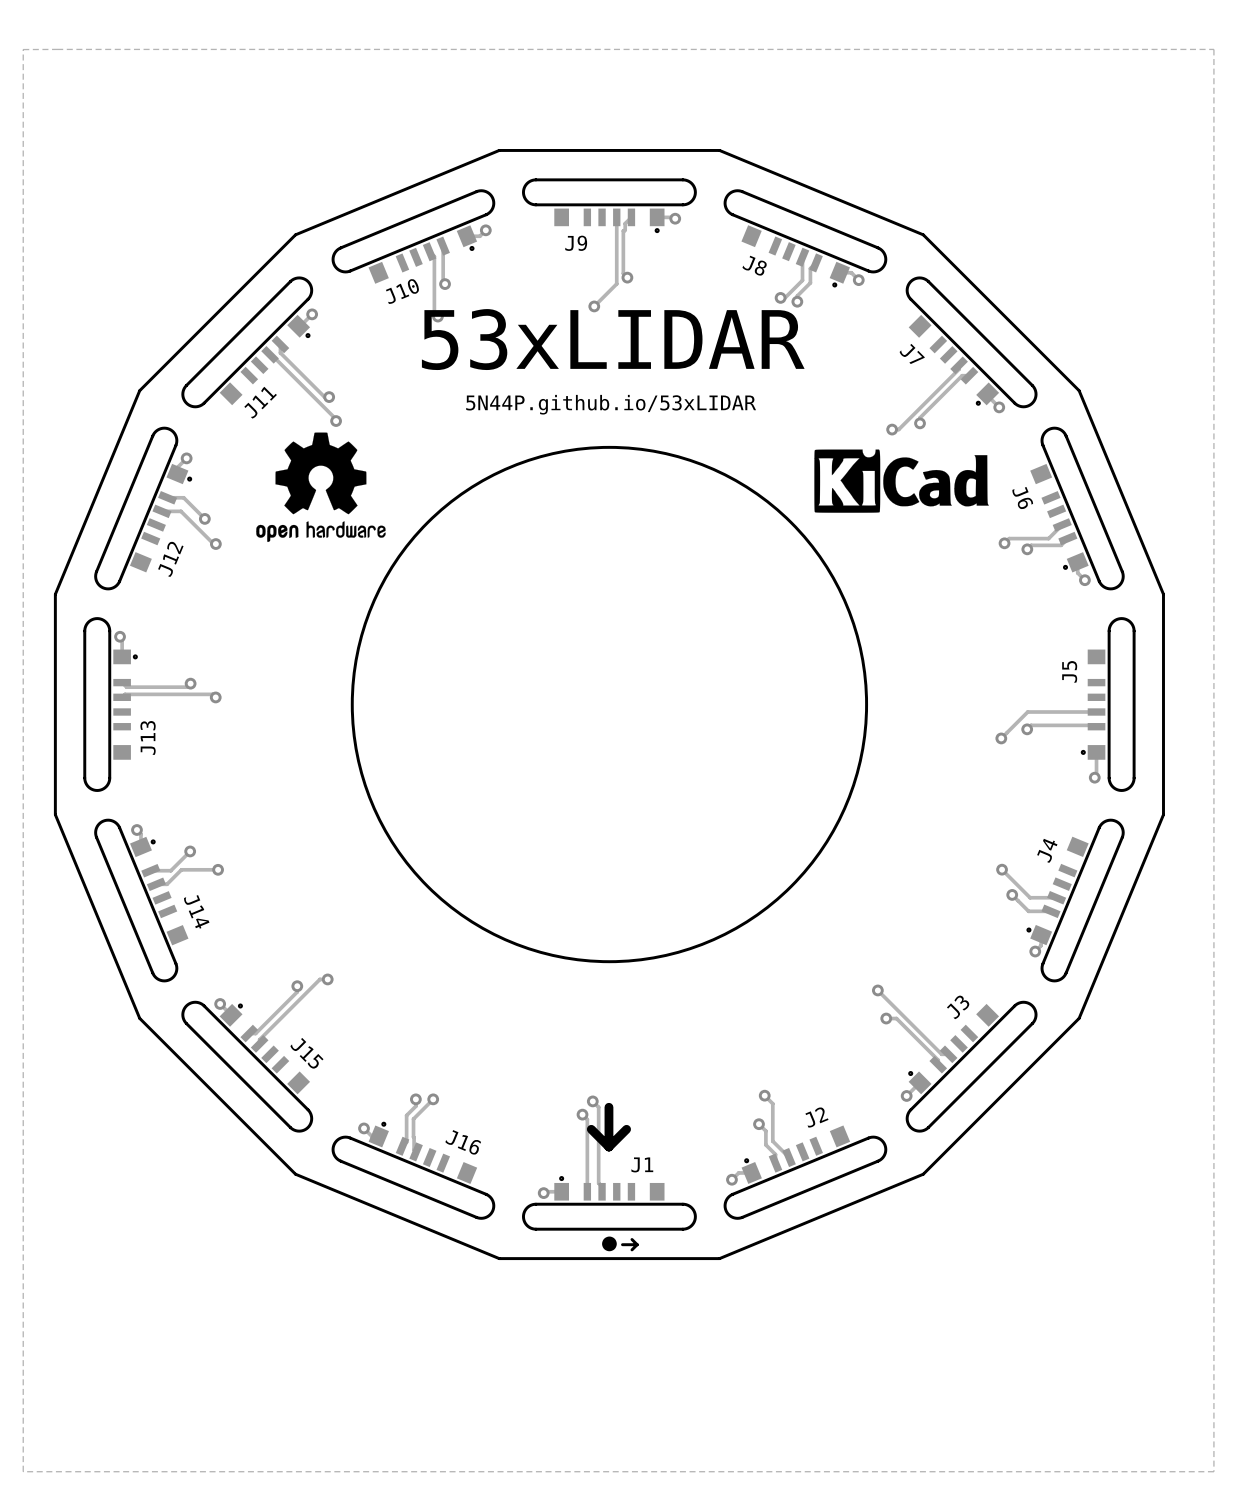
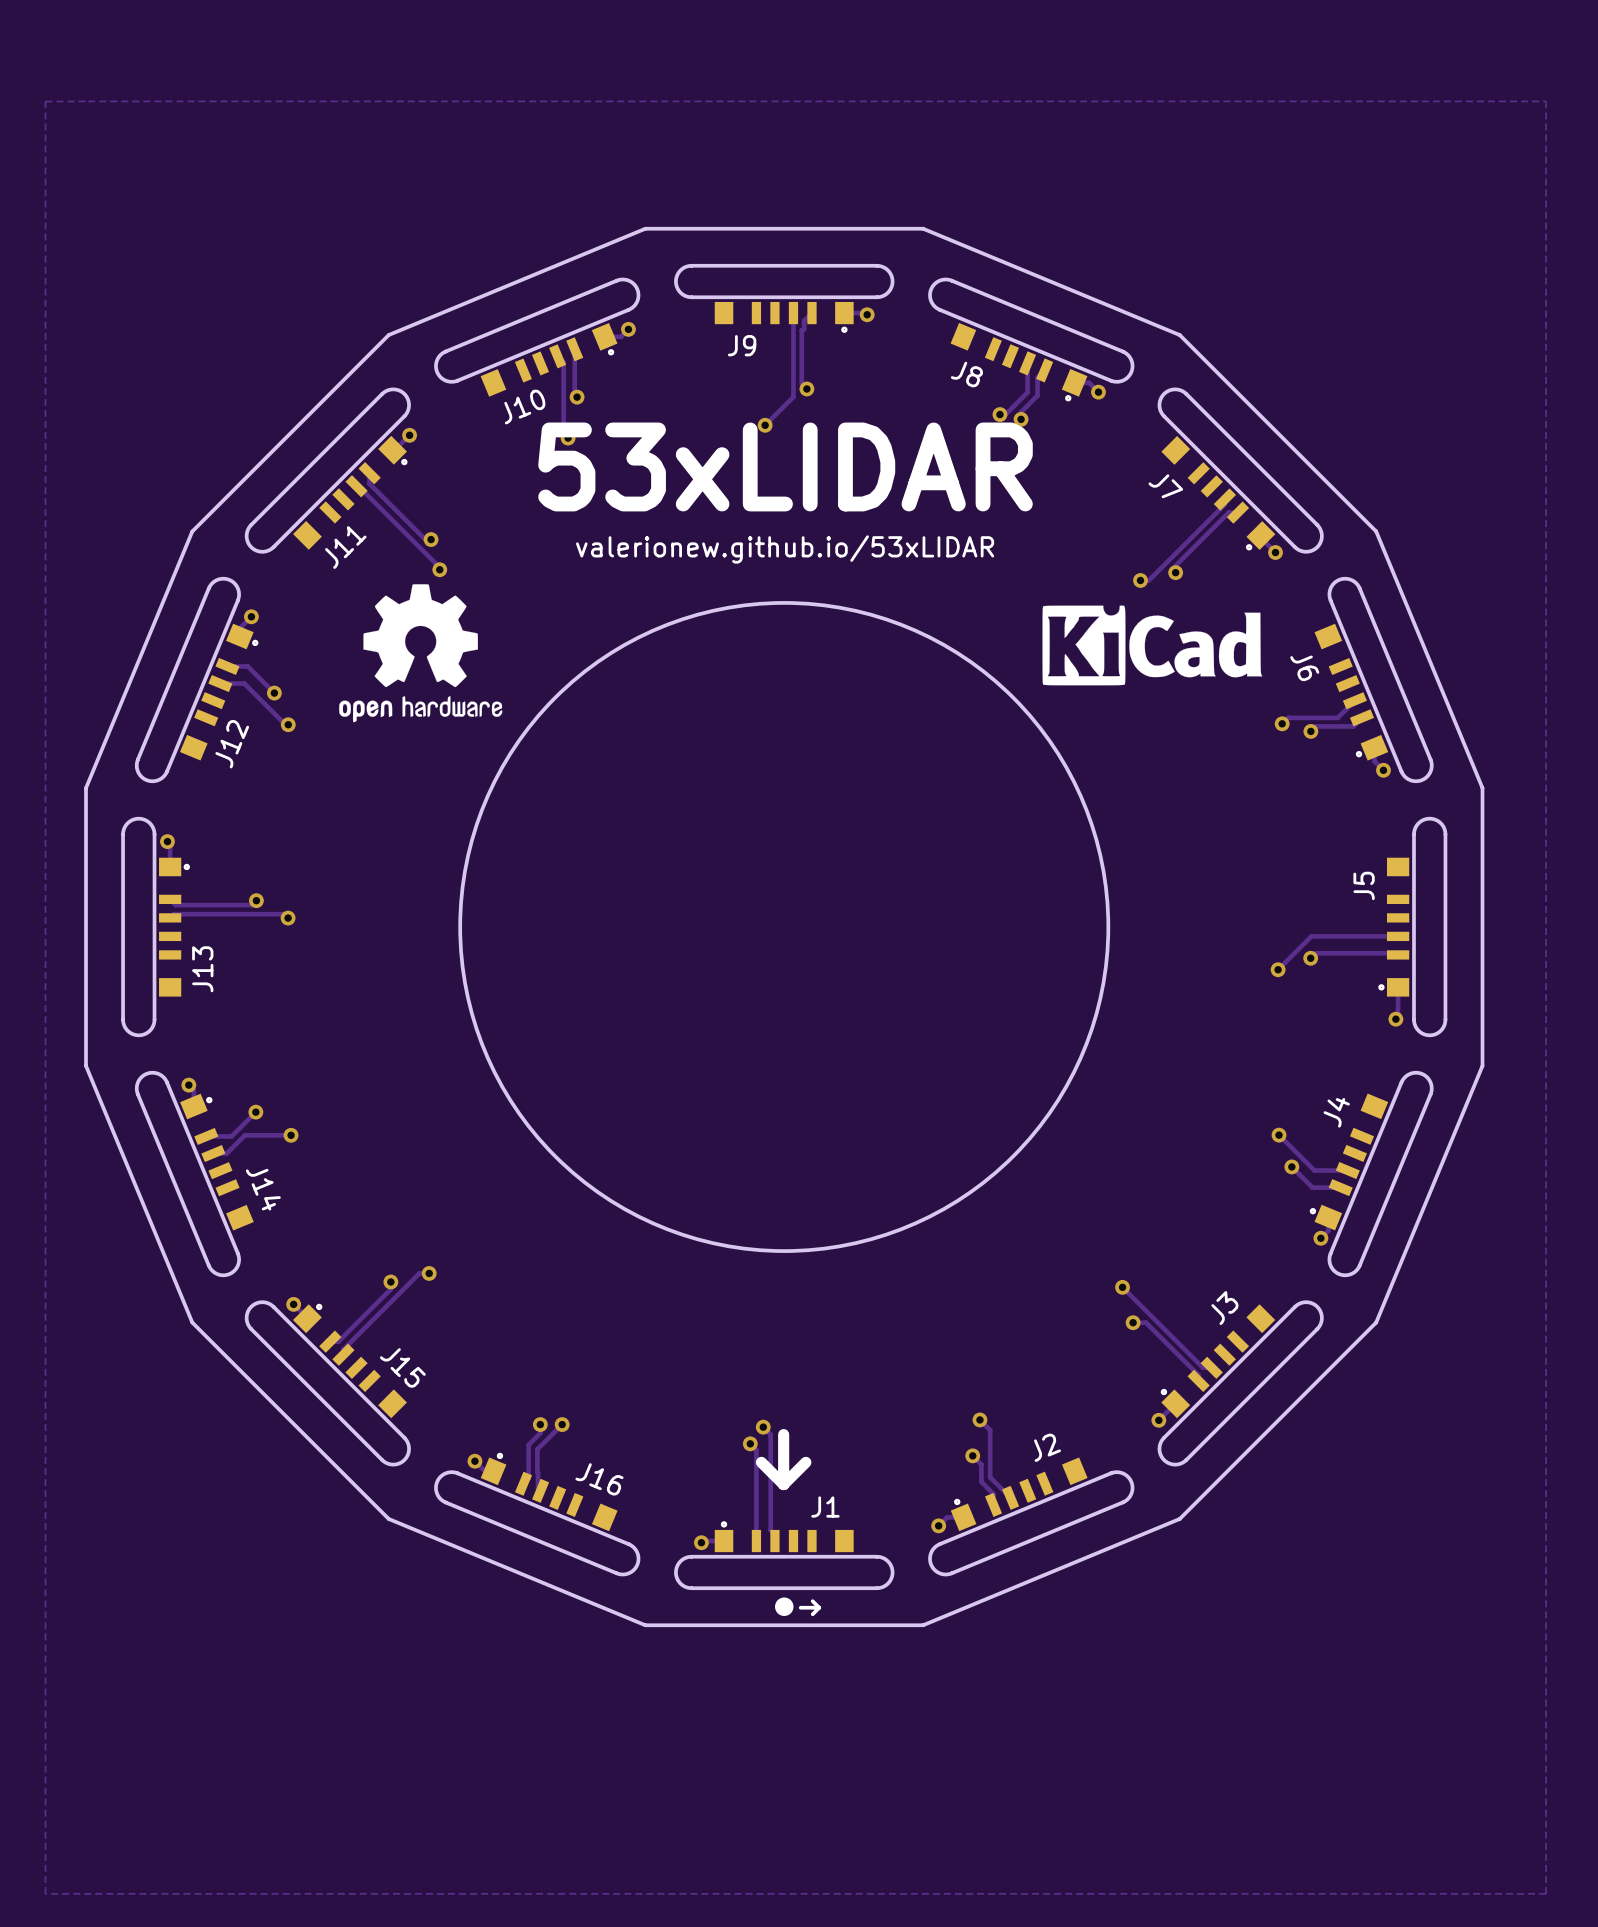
text: 5N44P.github.io/53xLIDAR (611, 404) -> valerionew.github.io/53xLIDAR (785, 549)

